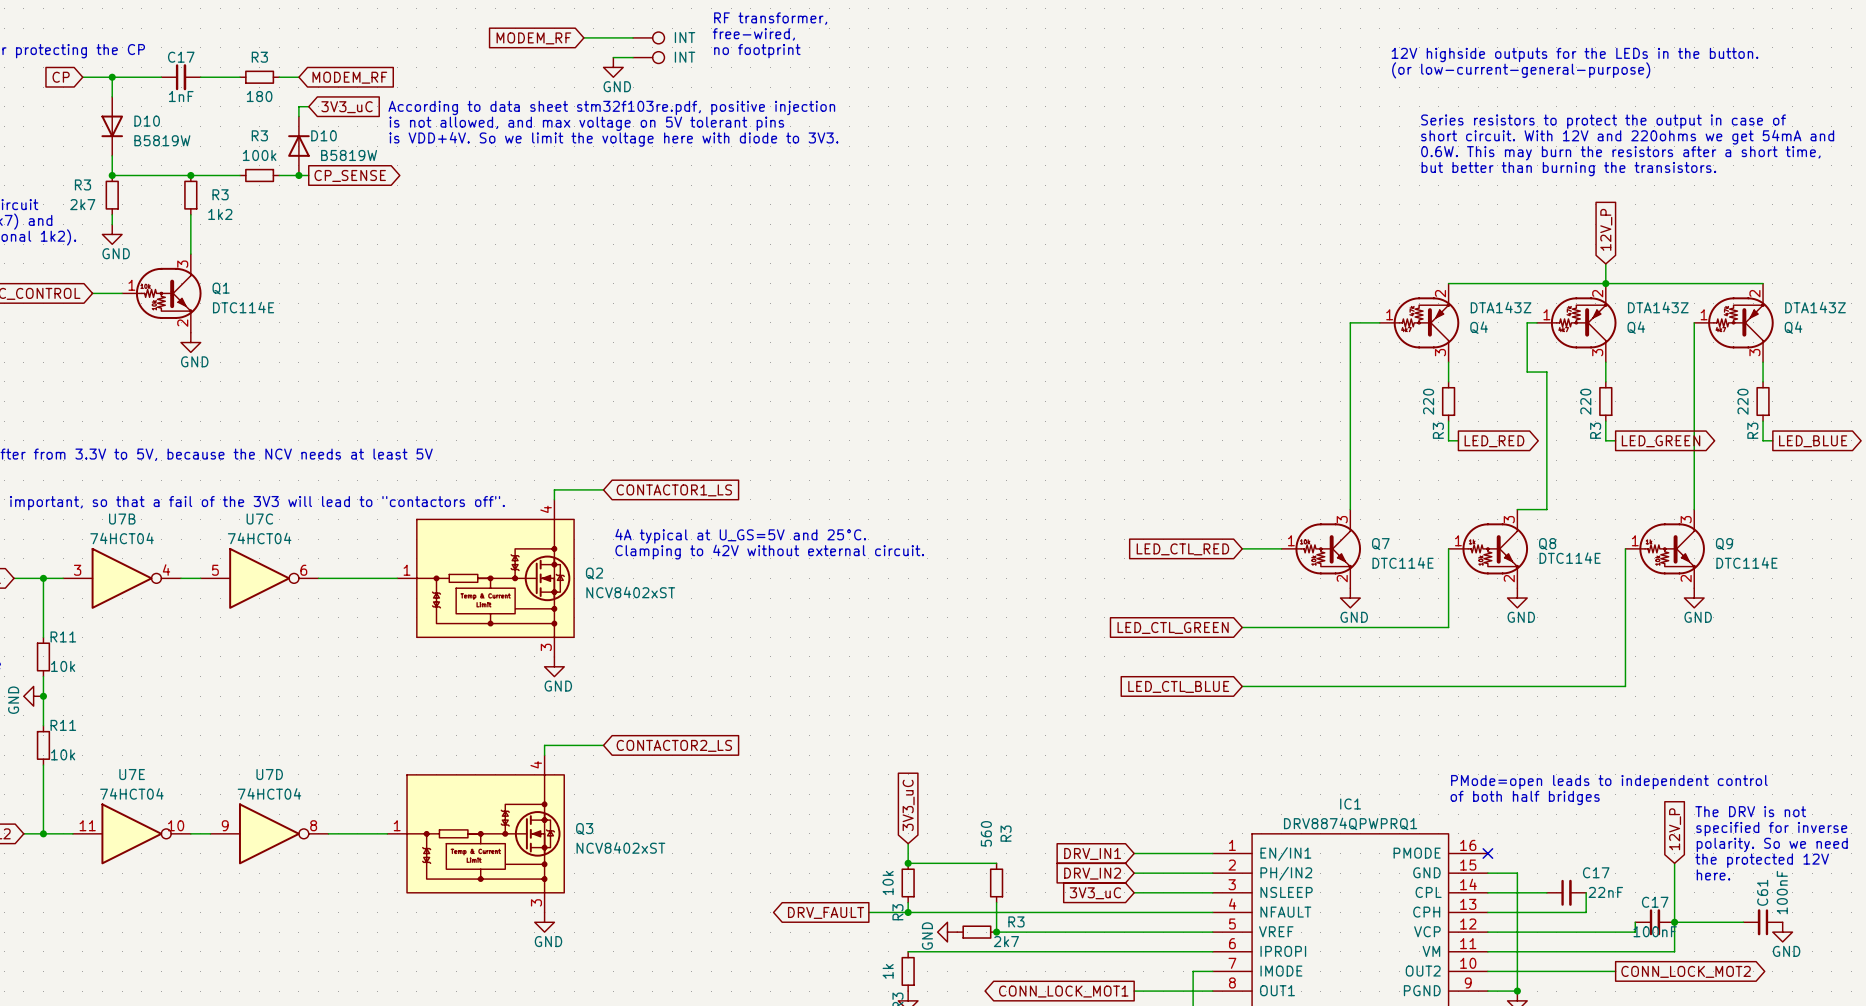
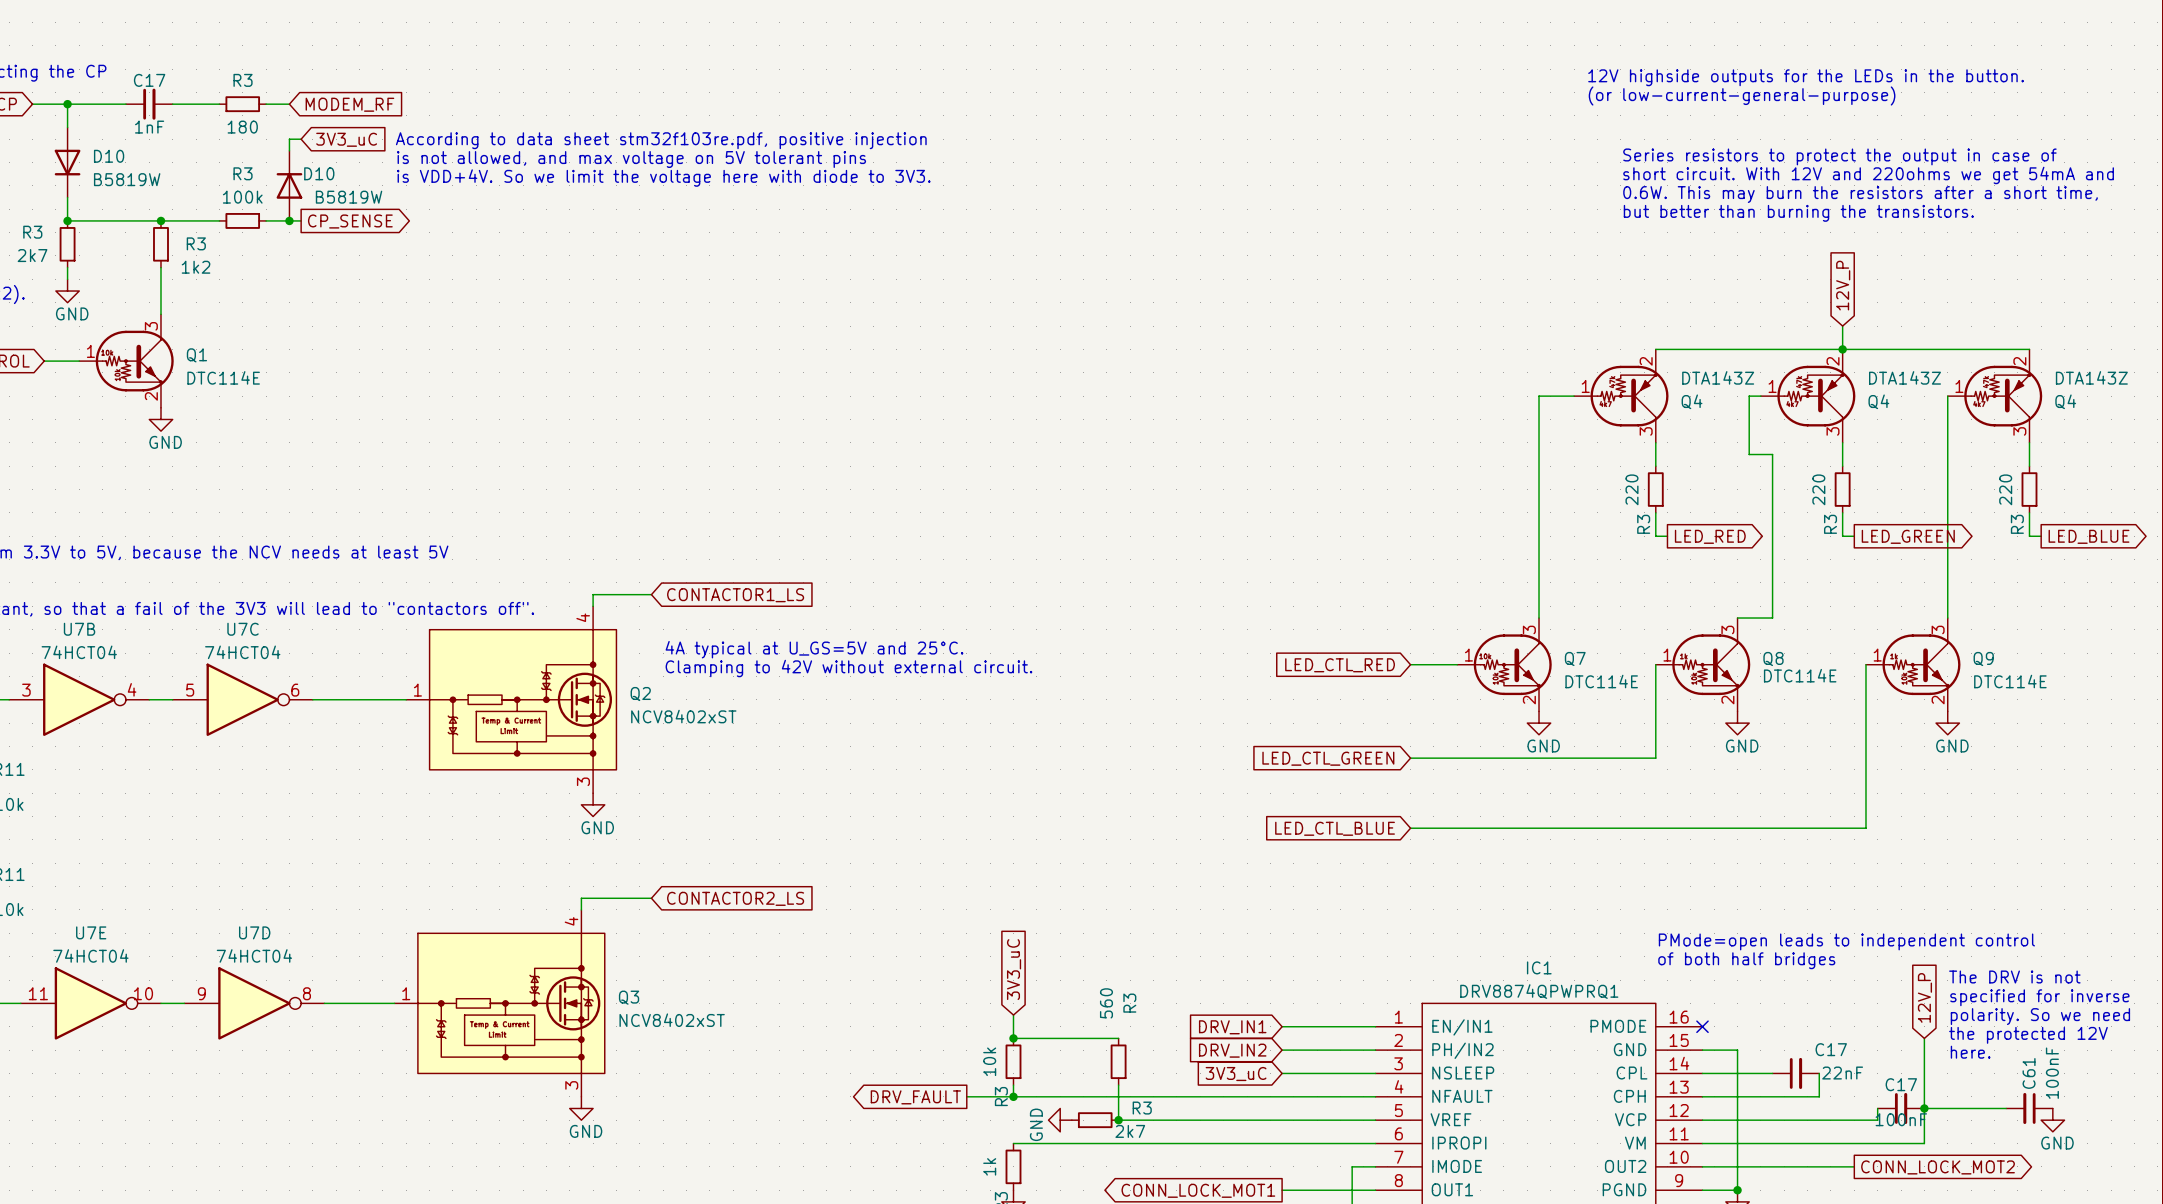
text: RF transformer, (770, 18) -> none
text: free-wired, (753, 34) -> none
wire: (583, 37) (633, 37) -> none
INT: (648, 37) -> none
global label: MODEM_RF (533, 38) -> none
text: no footprint (757, 51) -> none
wire: (613, 57) (633, 57) -> none
INT: (648, 57) -> none
power symbol: GND (613, 67) -> none

